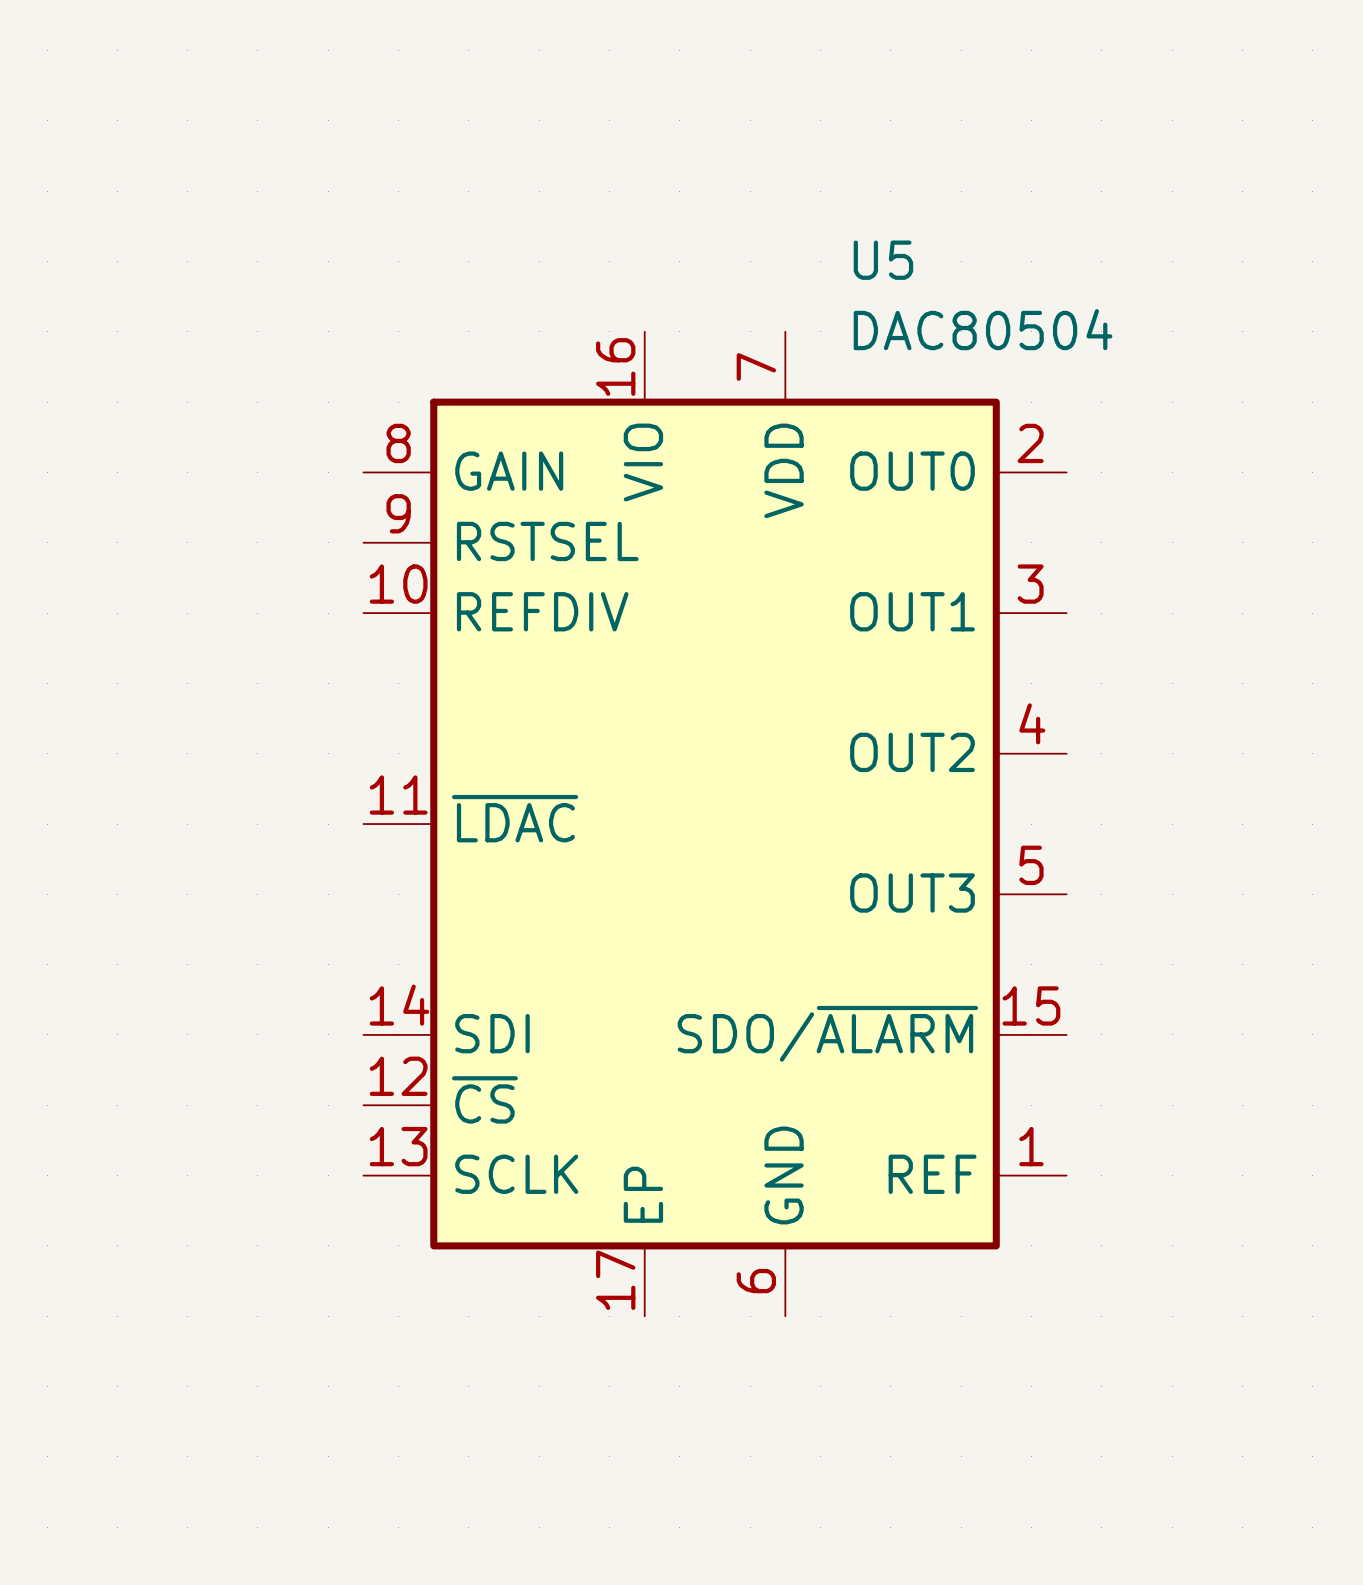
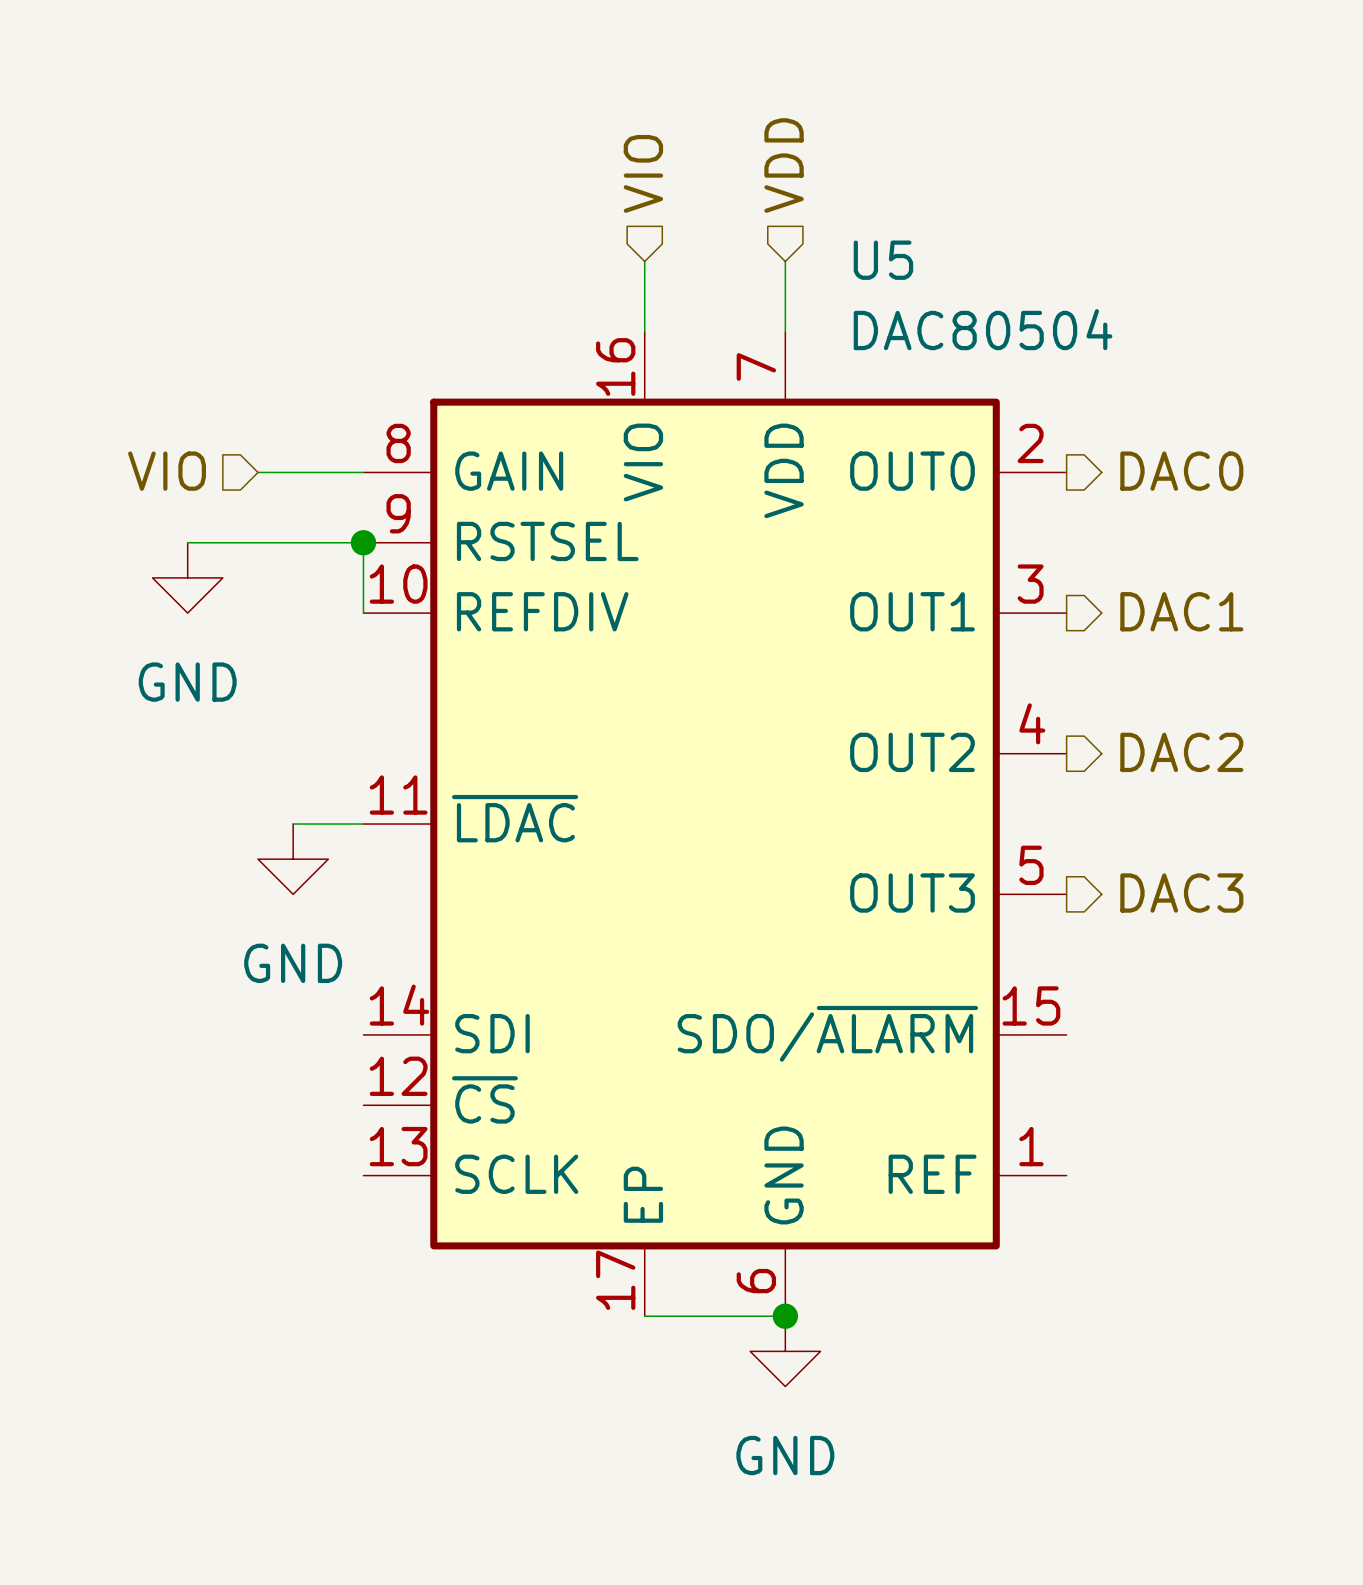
hierarchical label: none -> VDD (784, 165)
hierarchical label: none -> VIO (643, 173)
wire: none -> (644, 261) (644, 331)
wire: none -> (785, 261) (785, 331)
hierarchical label: none -> VIO (167, 471)
hierarchical label: none -> DAC0 (1181, 471)
wire: none -> (257, 472) (363, 472)
wire: none -> (187, 542) (363, 542) (363, 613)
junction: none -> (363, 542)
power symbol: none -> GND (187, 577)
hierarchical label: none -> DAC1 (1181, 611)
hierarchical label: none -> DAC2 (1181, 752)
wire: none -> (293, 824) (363, 824)
power symbol: none -> GND (293, 859)
hierarchical label: none -> DAC3 (1181, 893)
wire: none -> (644, 1316) (785, 1316)
junction: none -> (785, 1316)
power symbol: none -> GND (785, 1351)

